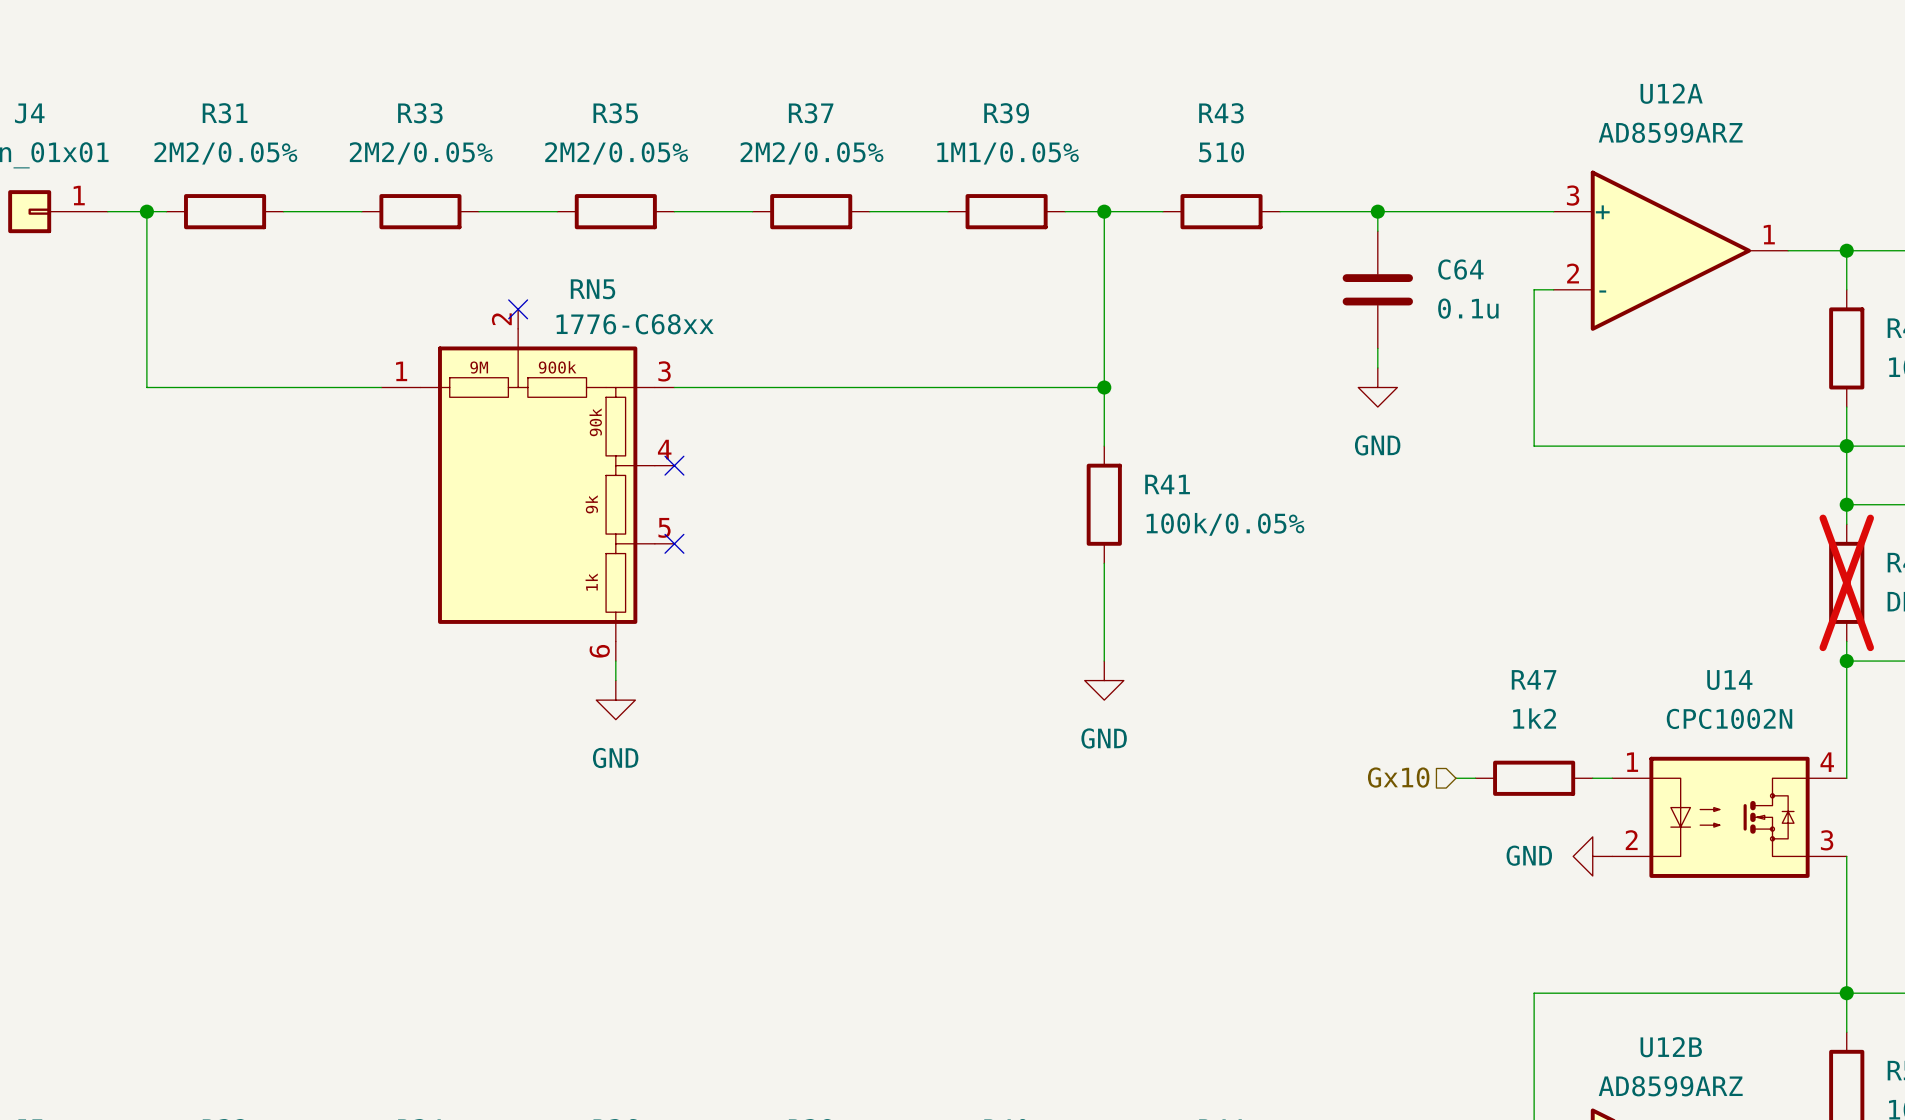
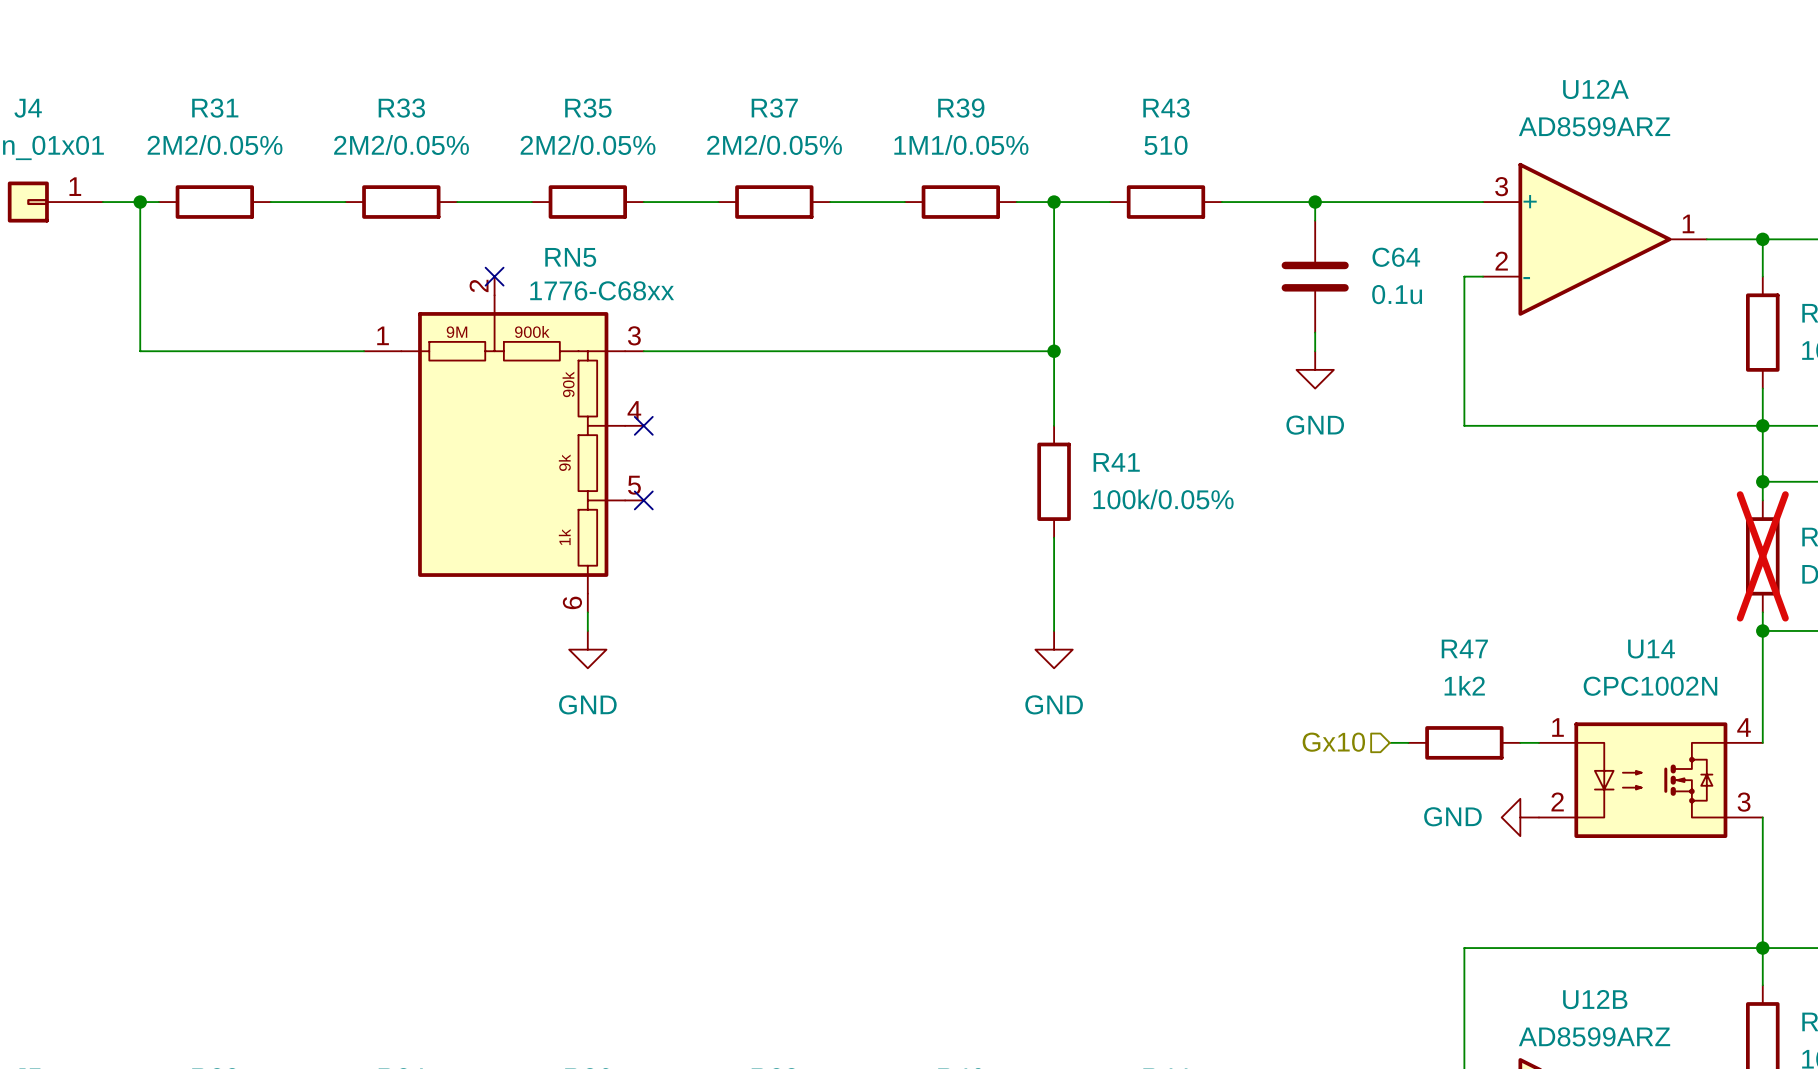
no-connect mark position: (518, 309) -> (494, 276)
wire: (146, 367) (146, 387) (381, 387) -> (140, 351) (364, 351)
wire: (674, 387) (1104, 387) -> (643, 351) (1054, 351)
junction position: (1104, 387) -> (1054, 351)
no-connect mark position: (674, 465) -> (643, 425)
RN5 position: (527, 485) -> (503, 444)
no-connect mark position: (674, 543) -> (643, 500)
power symbol position: GND (615, 700) -> GND (587, 649)

